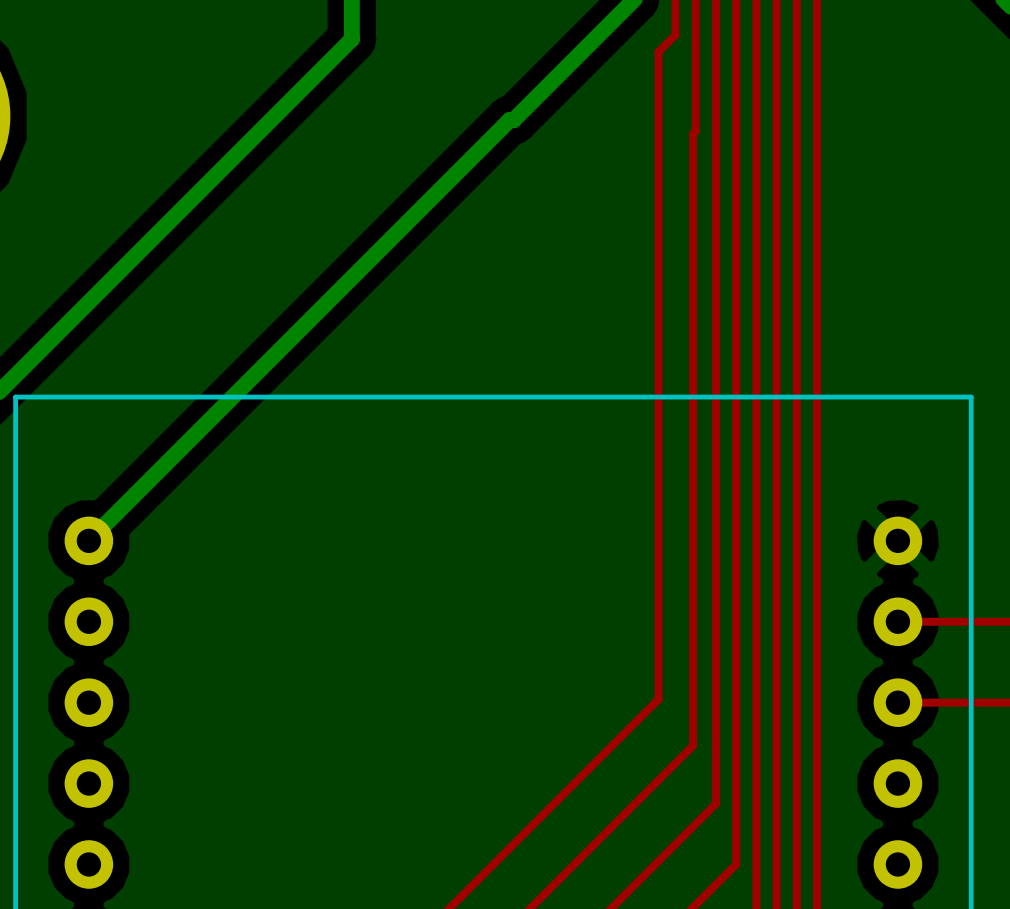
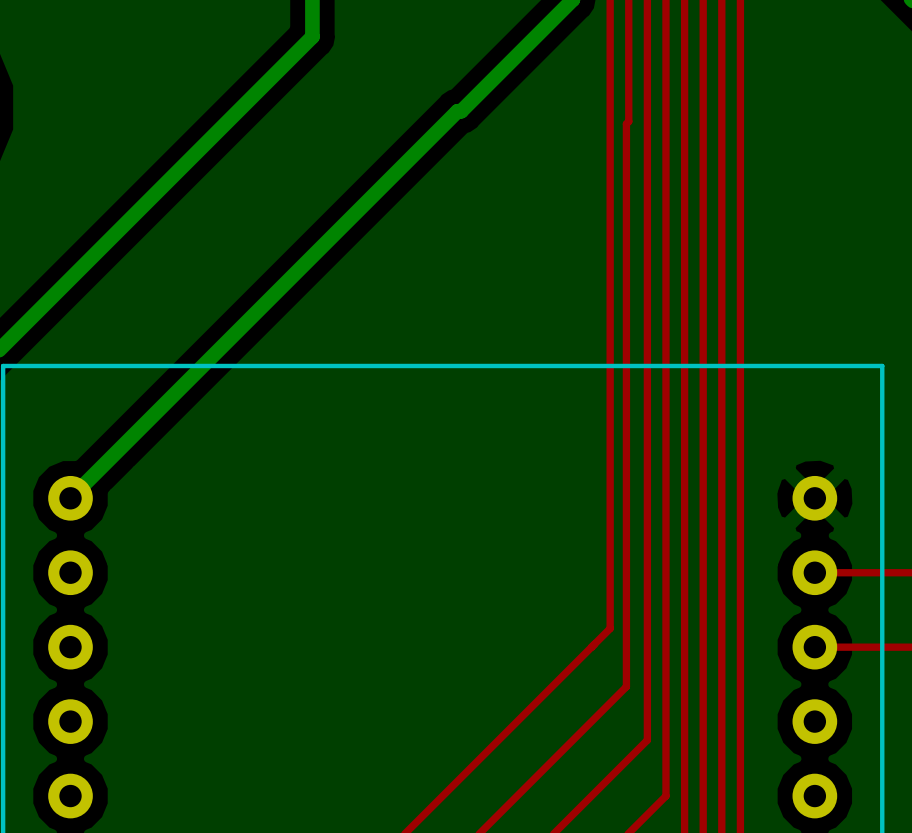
top track: (675, 35) (658, 51) (658, 699) -> (610, 32) (610, 628) (594, 644)

